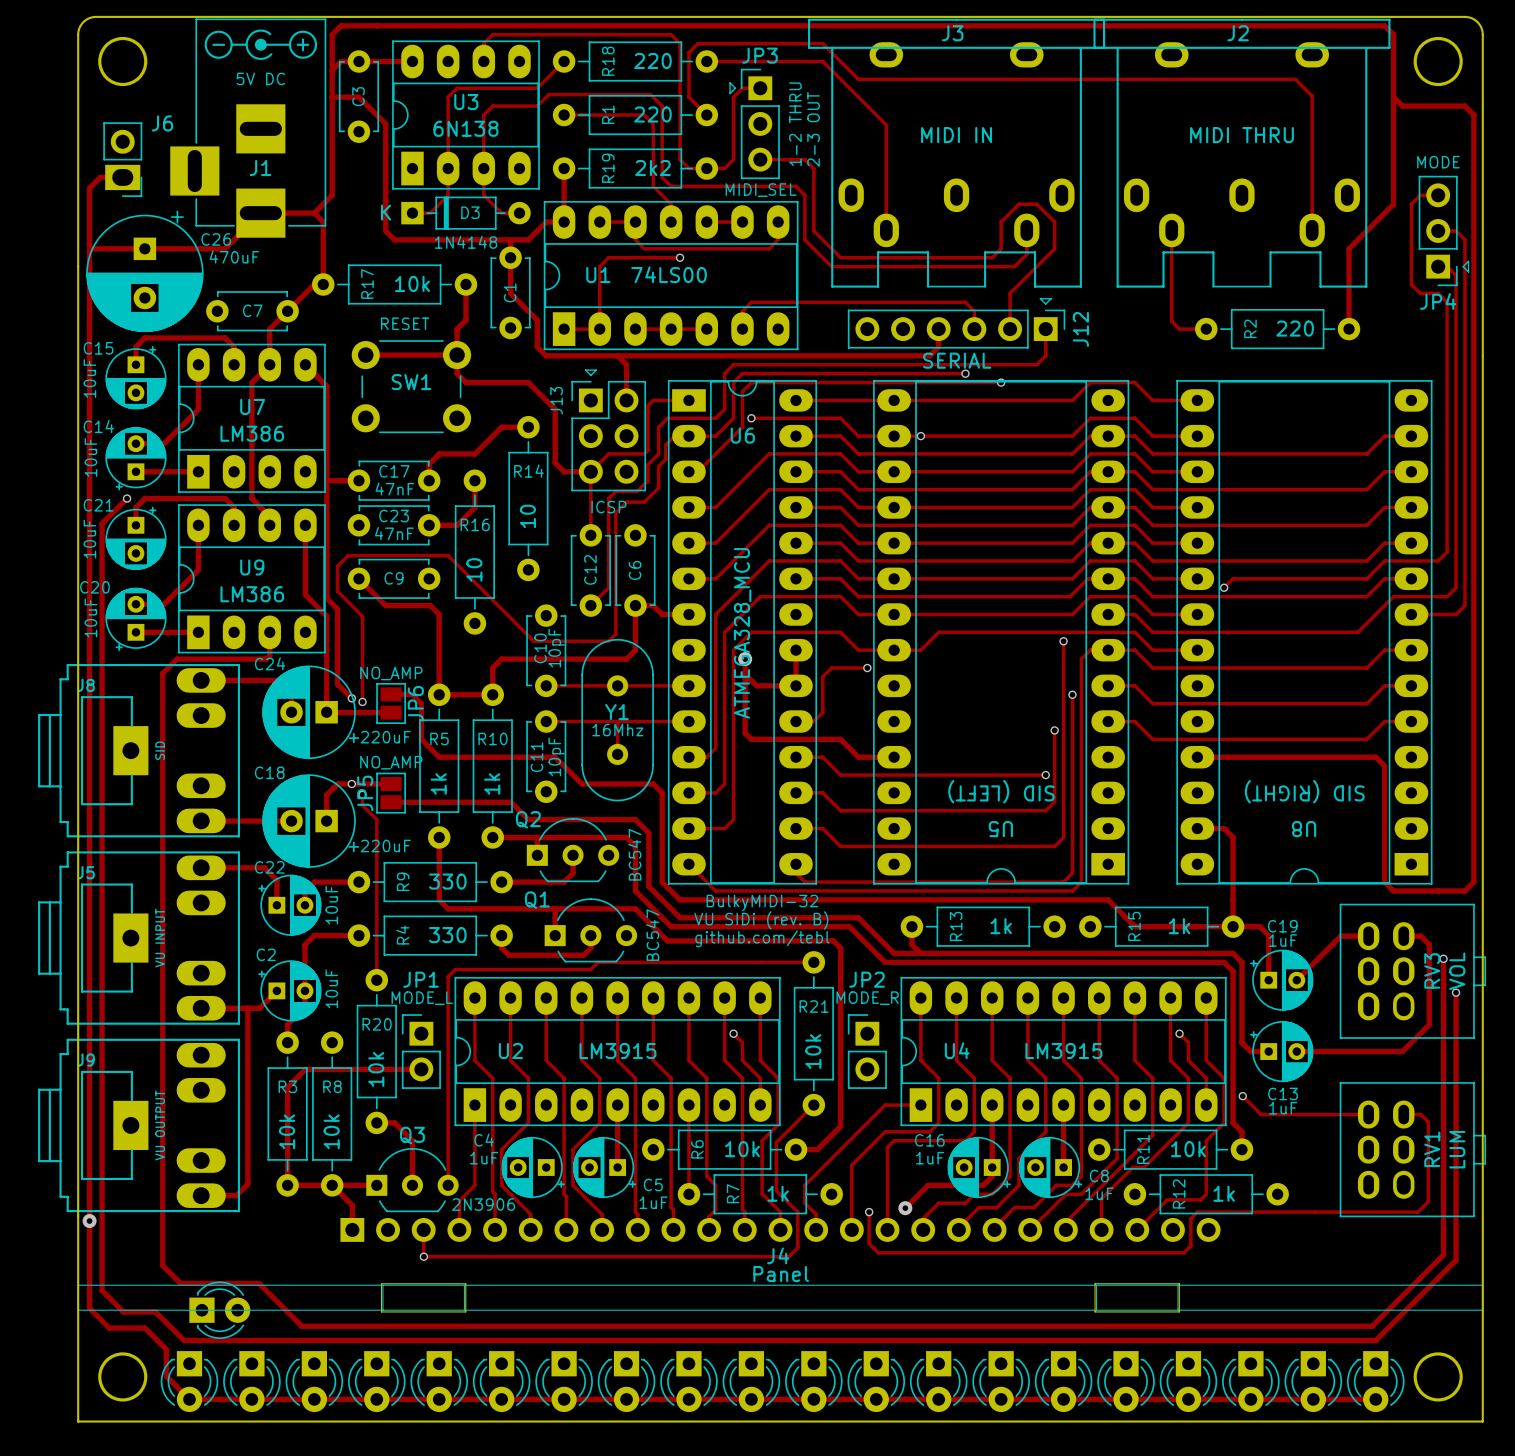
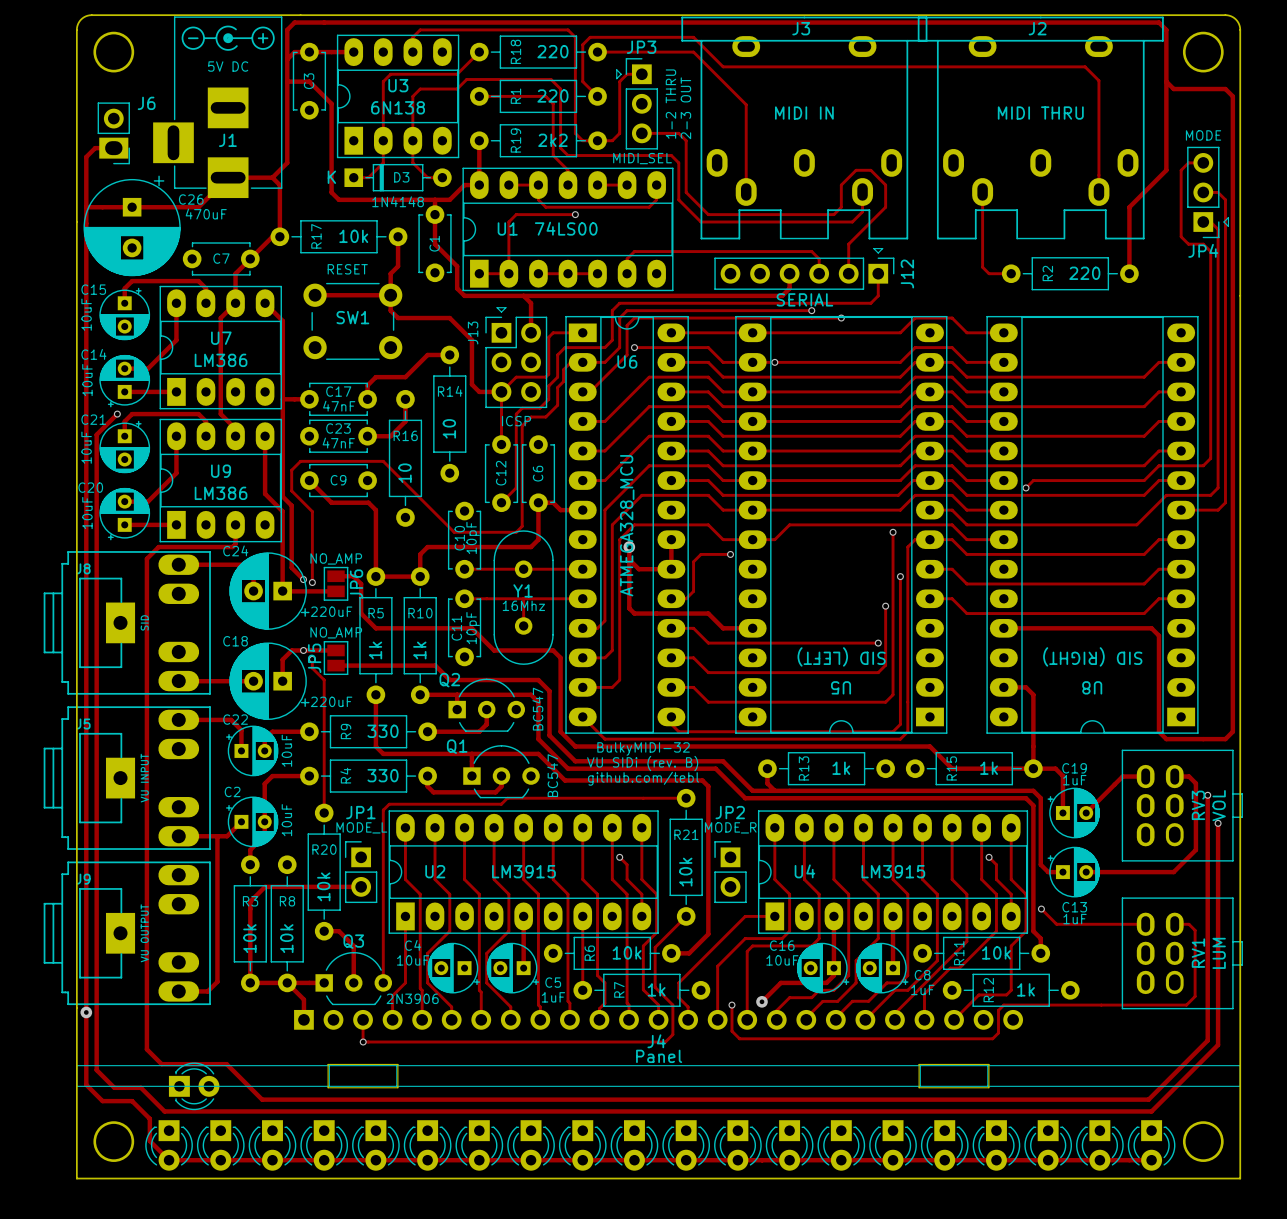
C4 value: 1uF (484, 1158) -> 10uF (413, 960)
C16 value: 1uF (930, 1158) -> 10uF (782, 960)

